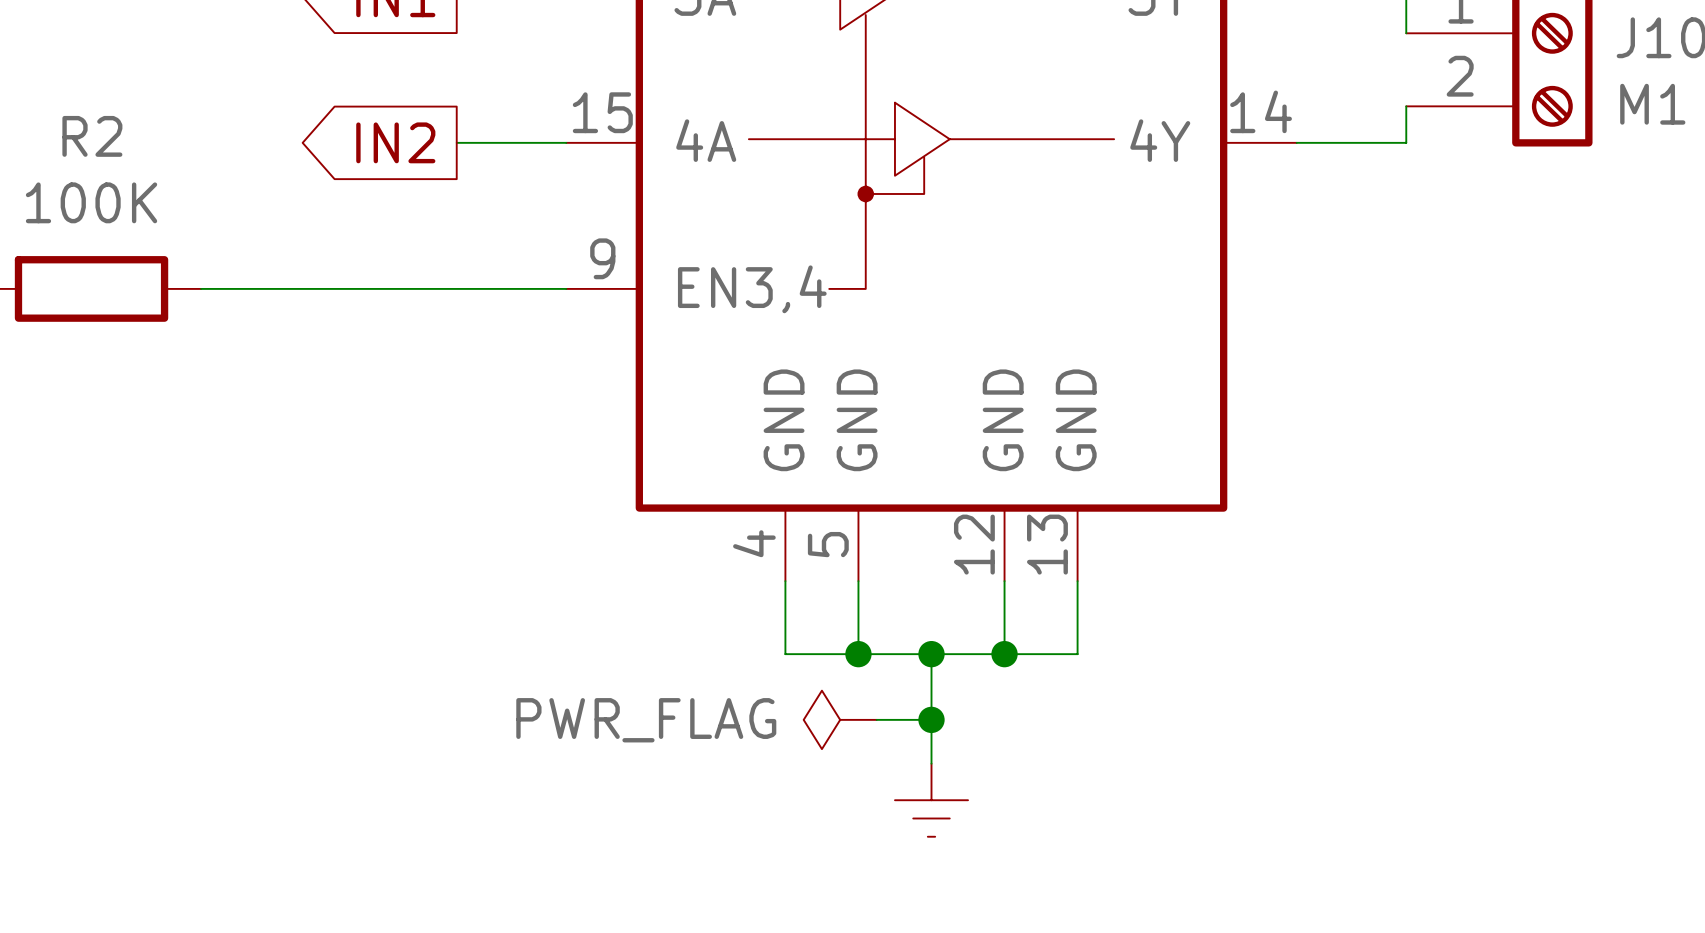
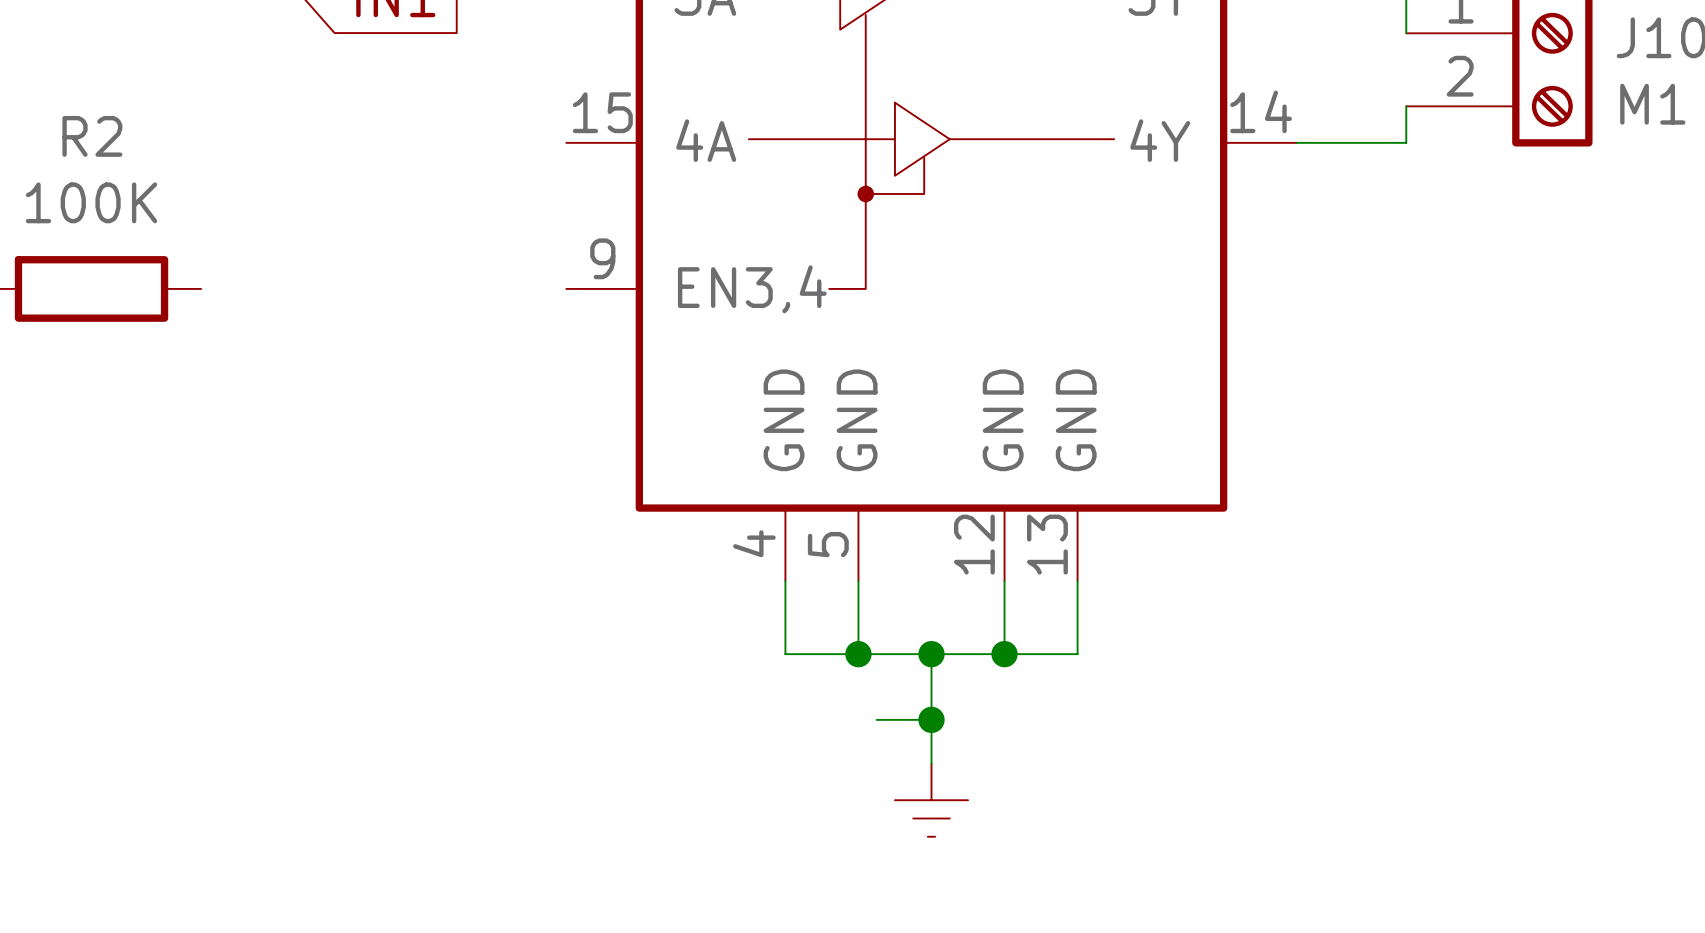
global label: IN2 (395, 142) -> none
wire: (456, 142) (566, 142) -> none
wire: (201, 288) (566, 288) -> none
power symbol: PWR_FLAG (840, 719) -> none

